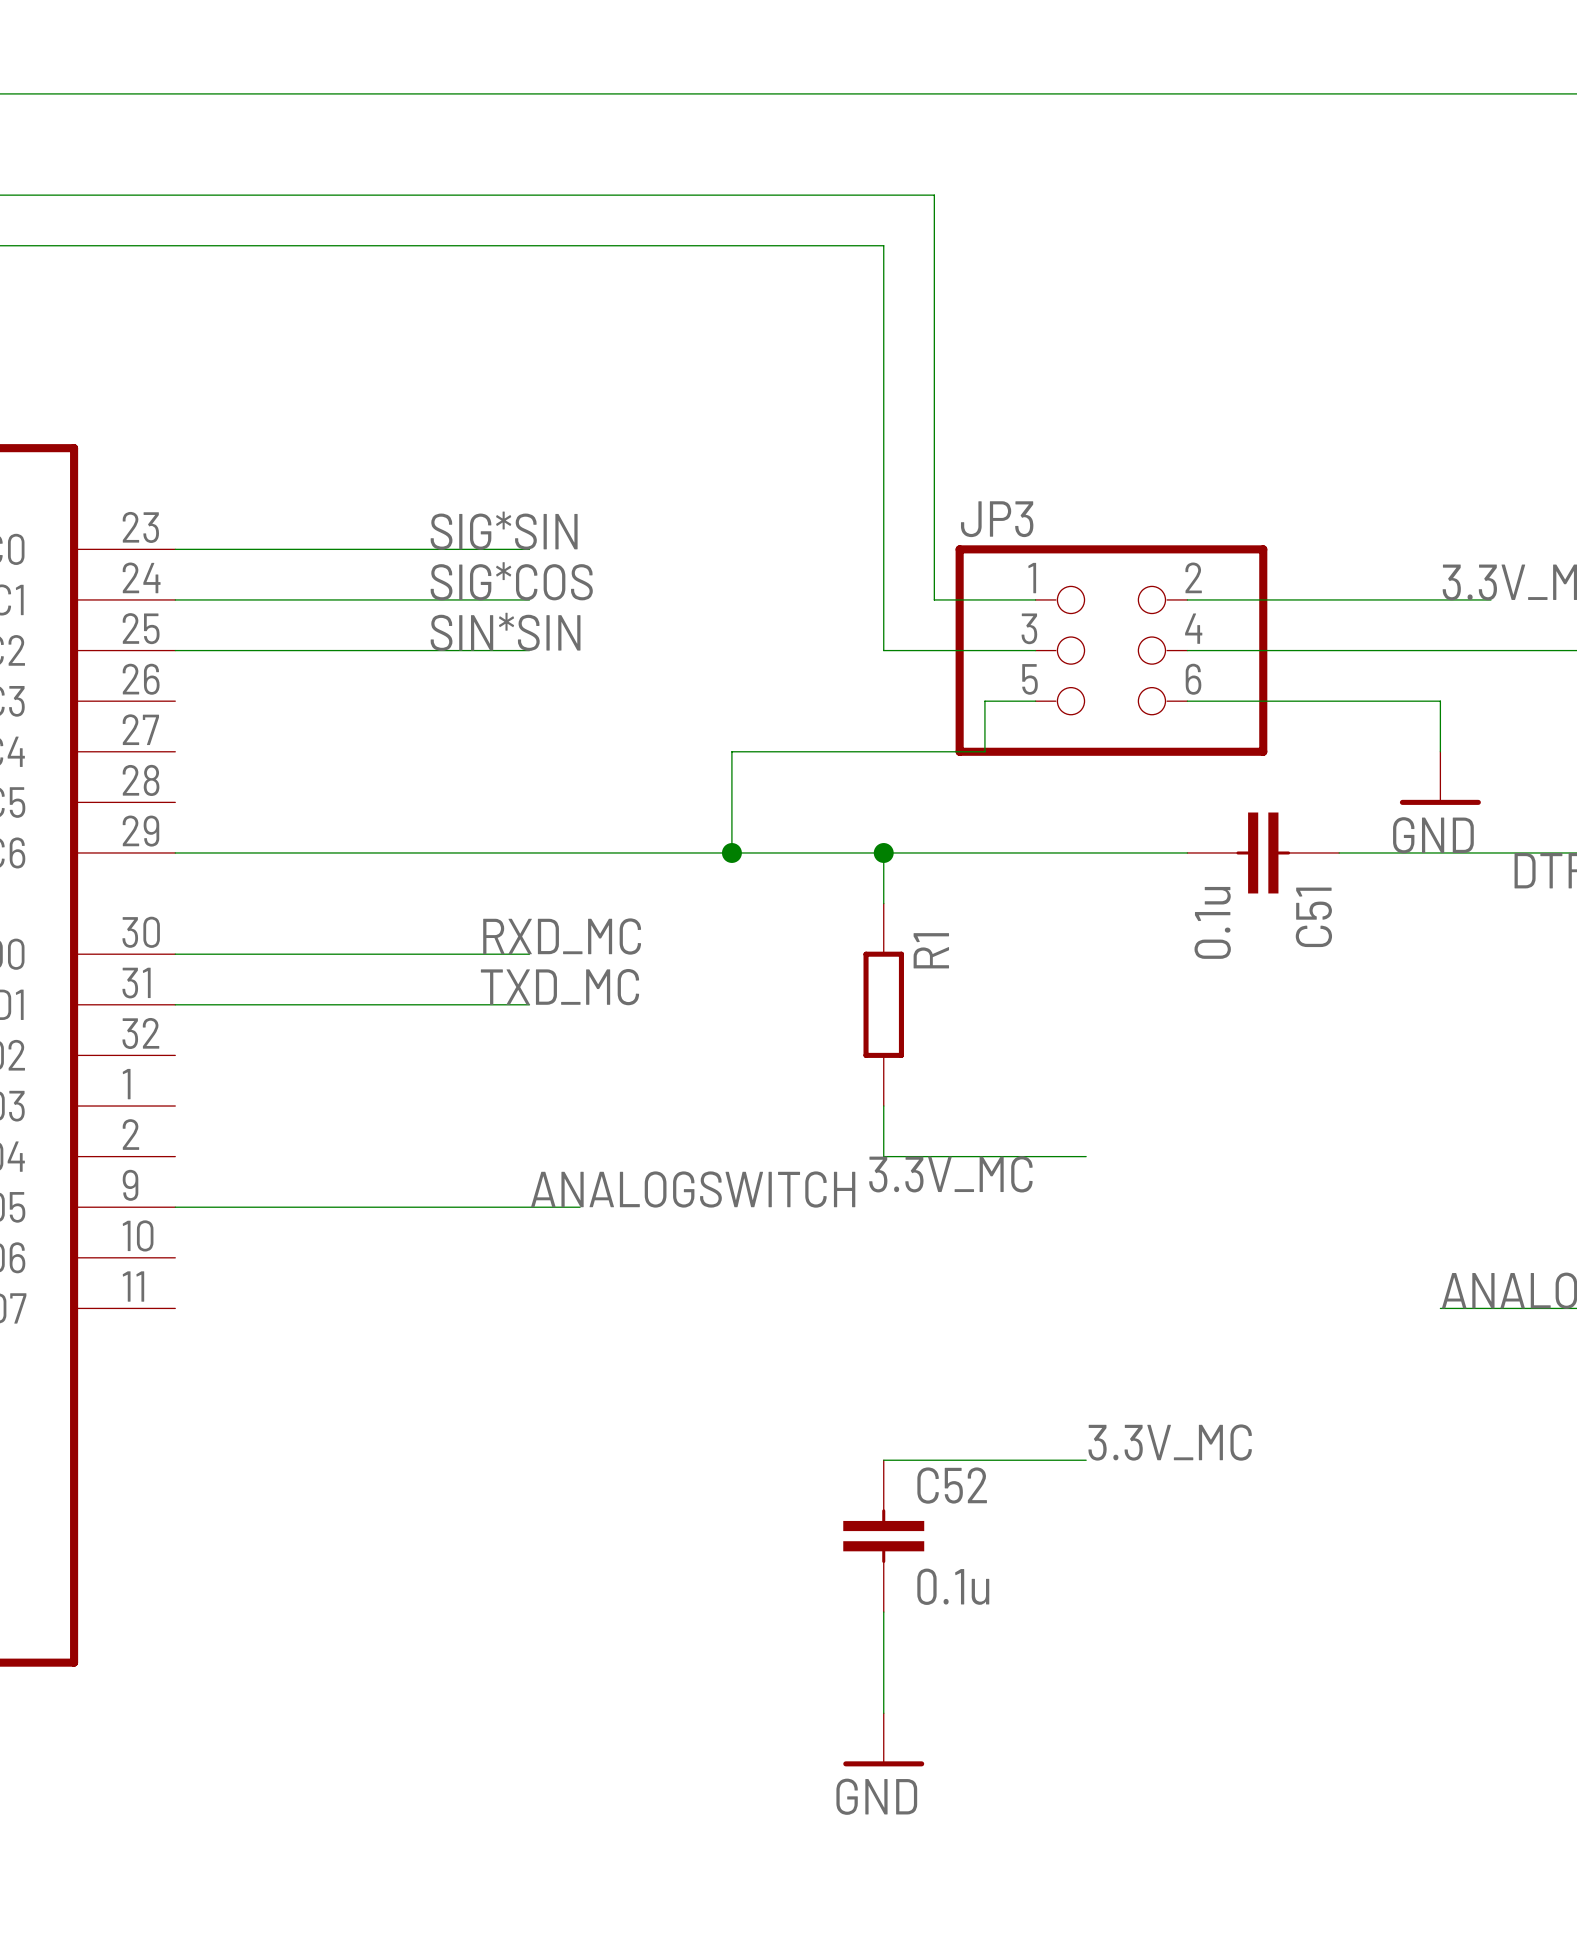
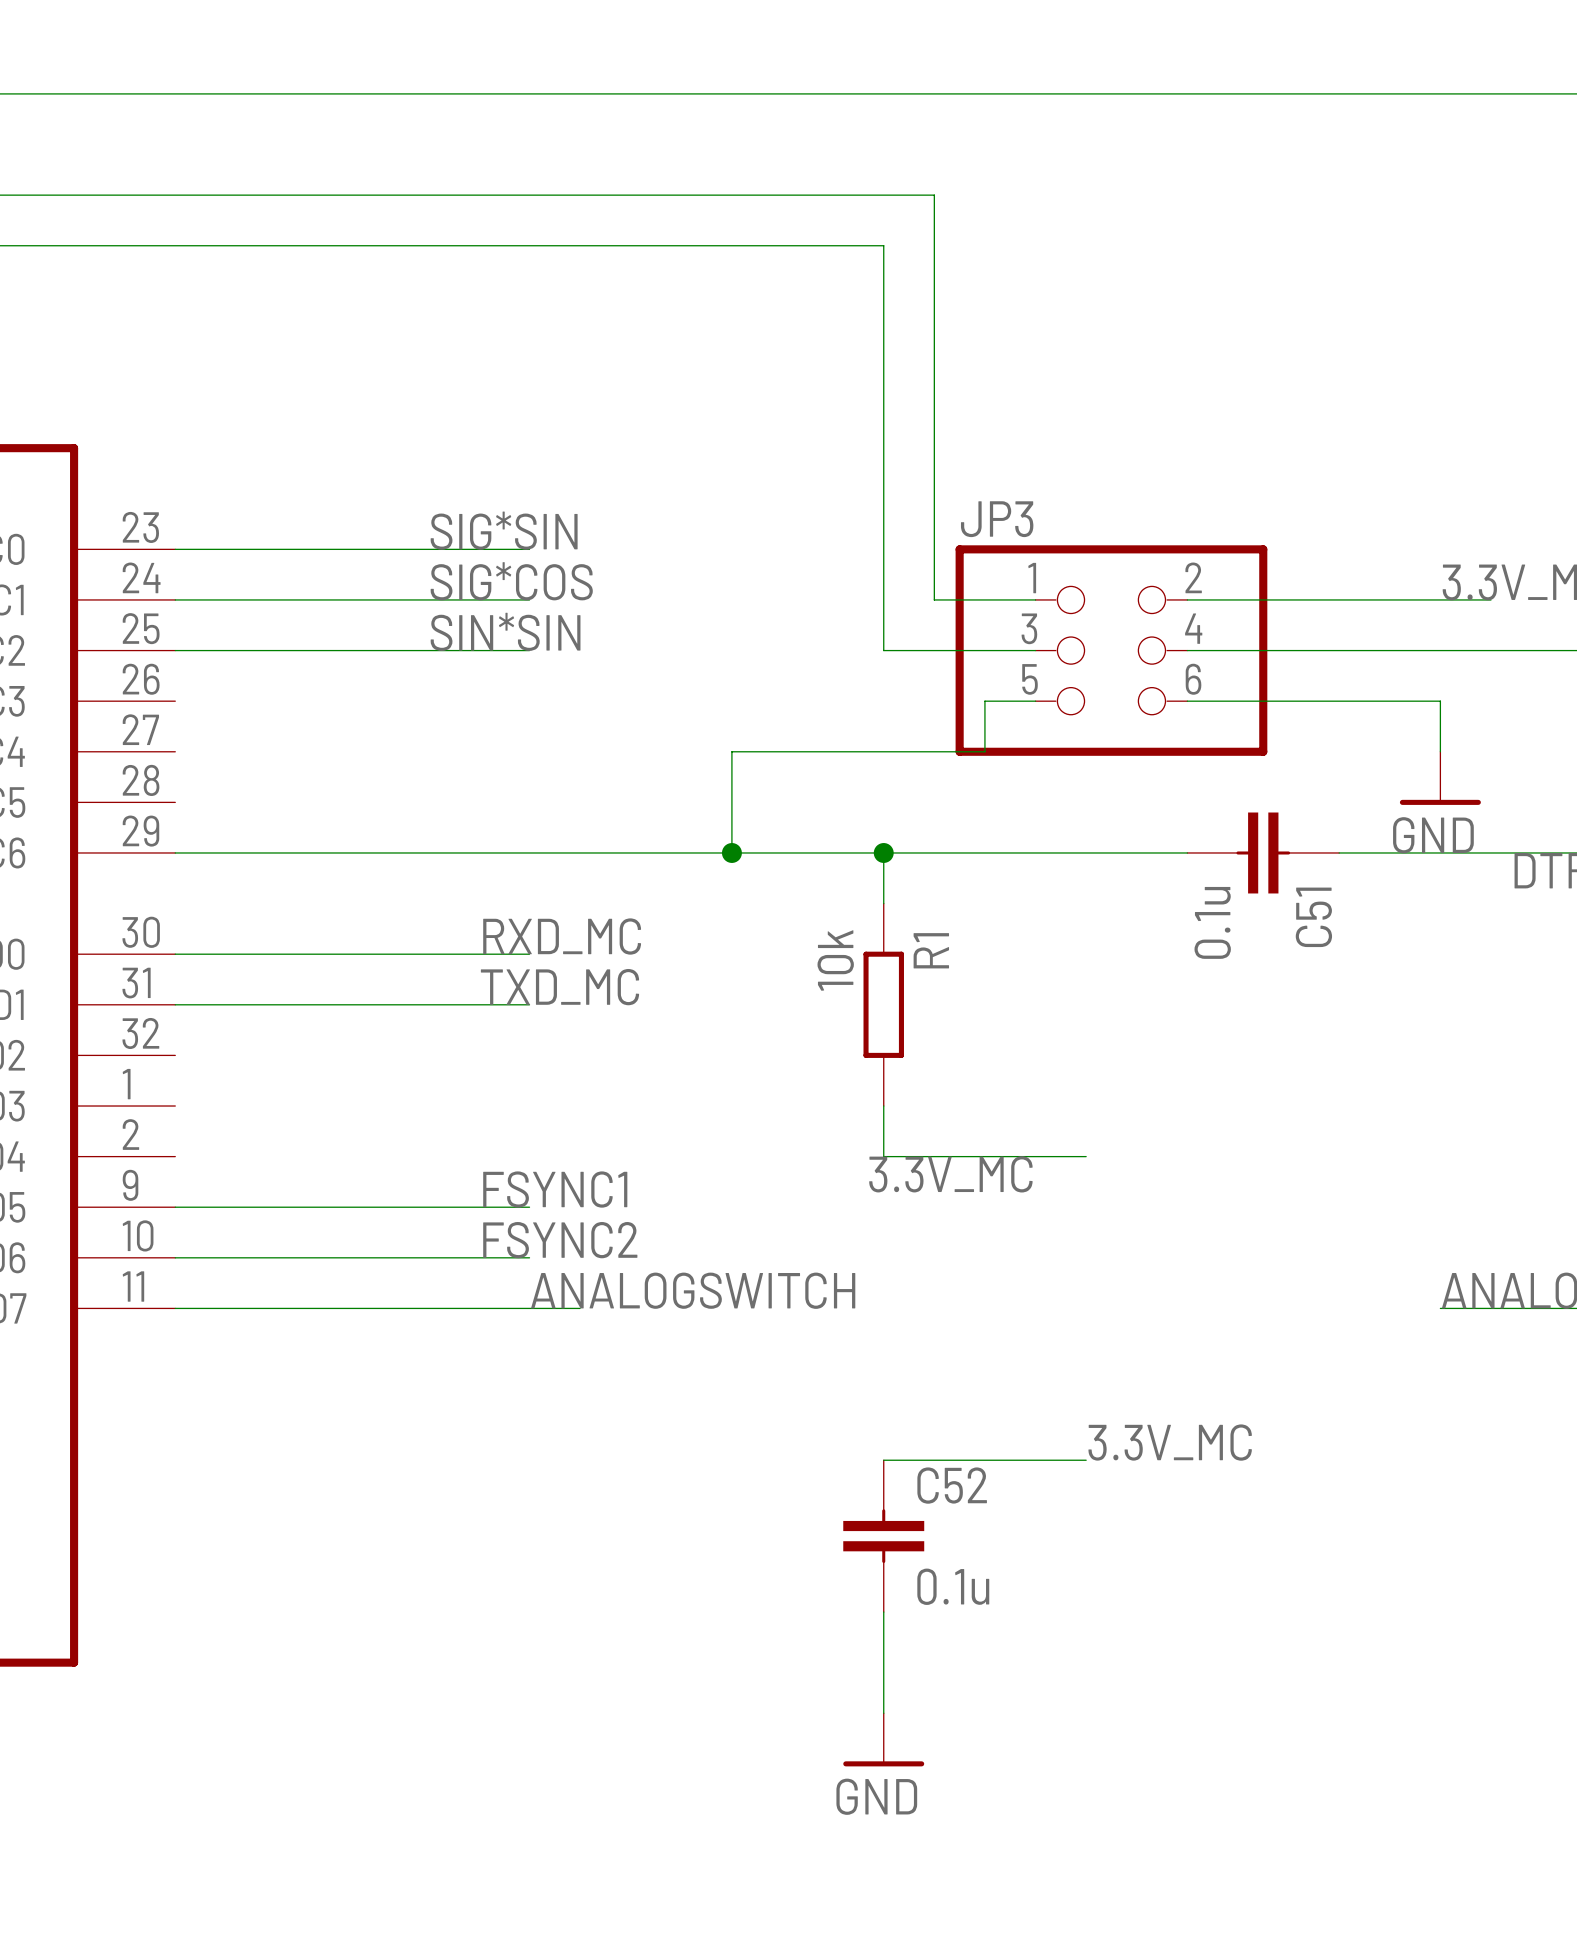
R1 value: none -> 10k (835, 960)
label: none -> FSYNC1 (555, 1189)
label position: ANALOGSWITCH (693, 1189) -> ANALOGSWITCH (693, 1290)
wire: (529, 1207) (580, 1207) -> none
label: none -> FSYNC2 (560, 1240)
wire: none -> (175, 1257) (529, 1257)
wire: none -> (175, 1308) (580, 1308)

